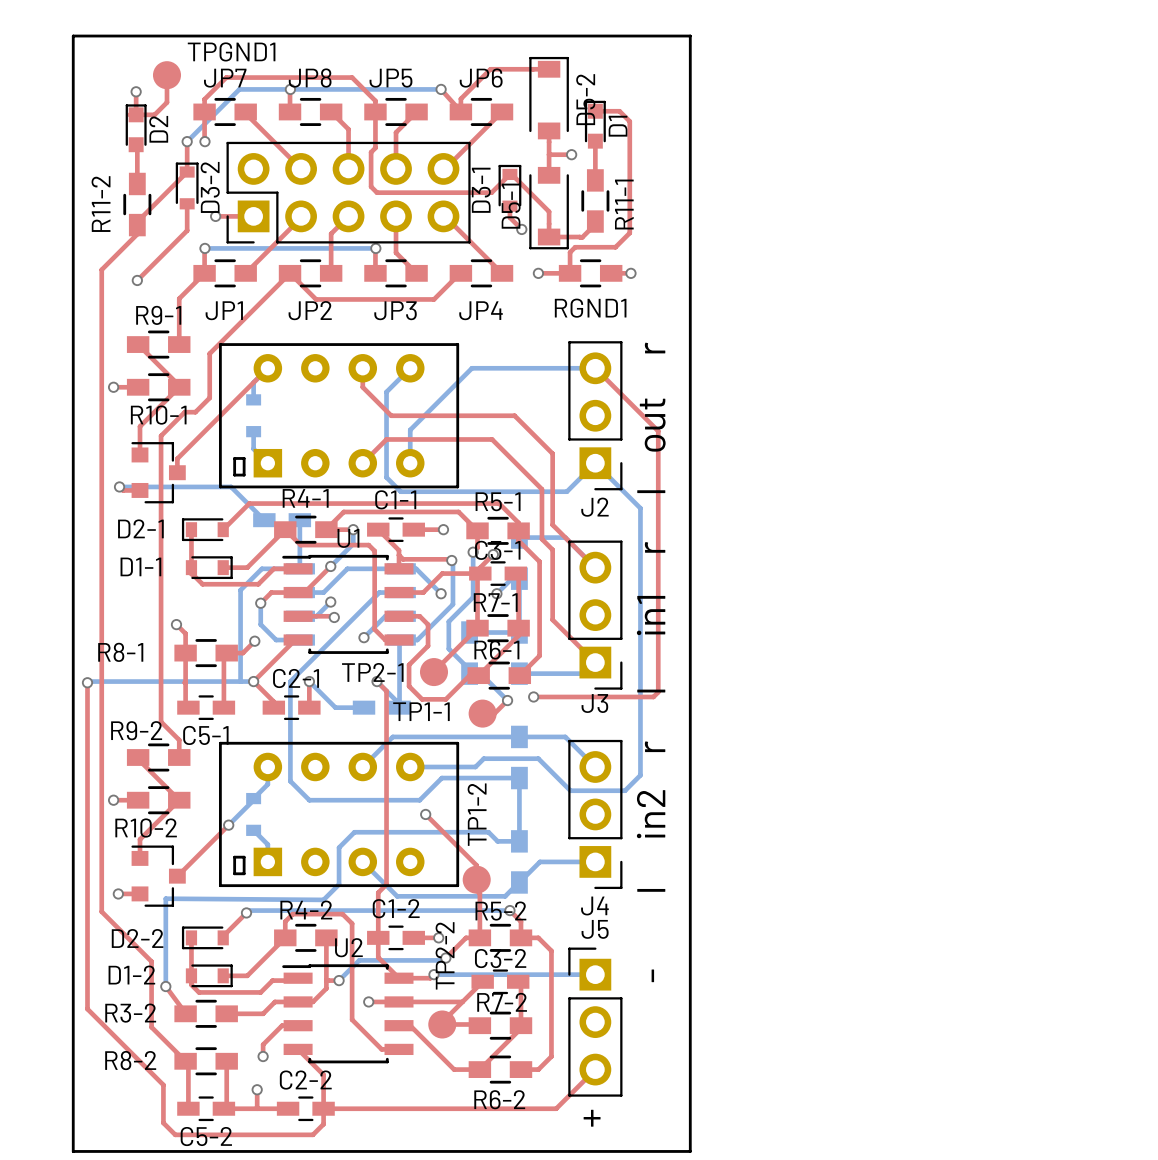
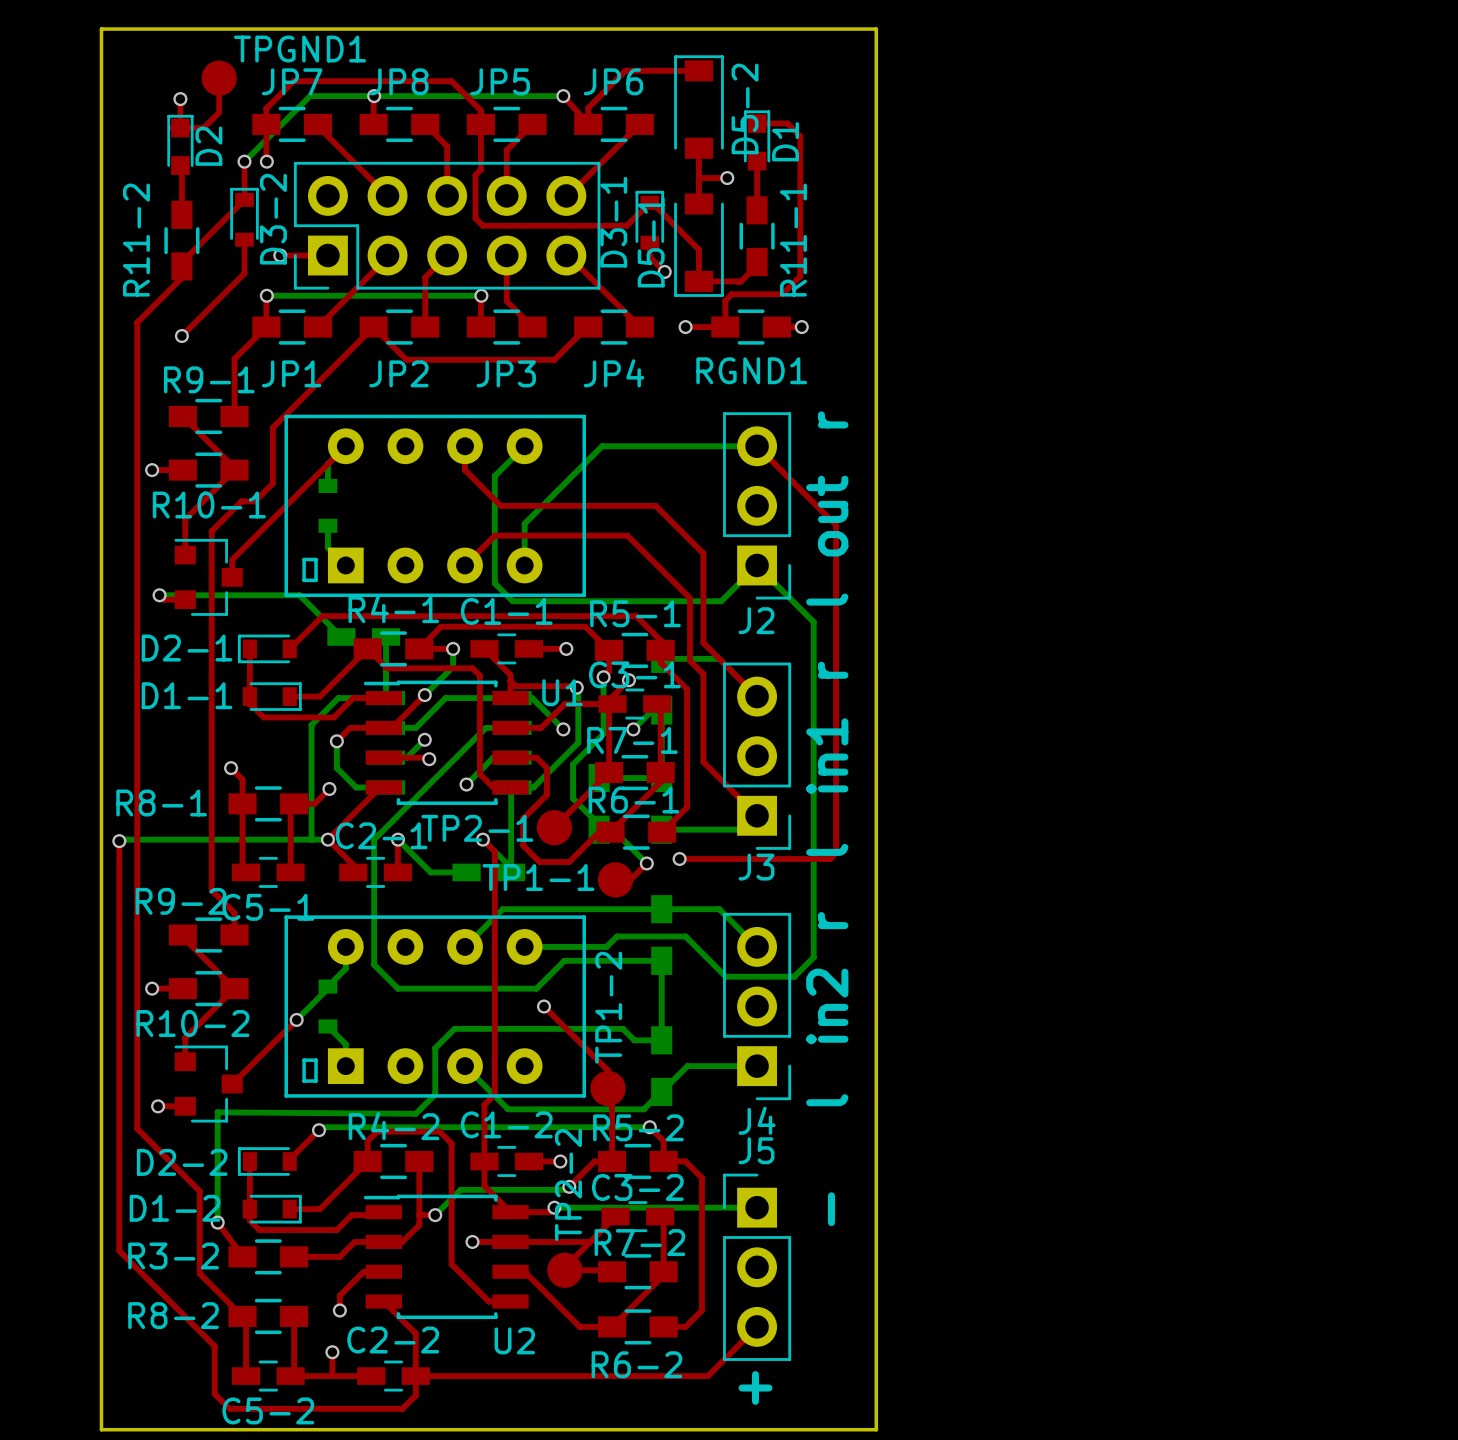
U1 name position: U1 (348, 538) -> U1 (562, 692)
U2 name position: U2 (348, 947) -> U2 (514, 1340)

